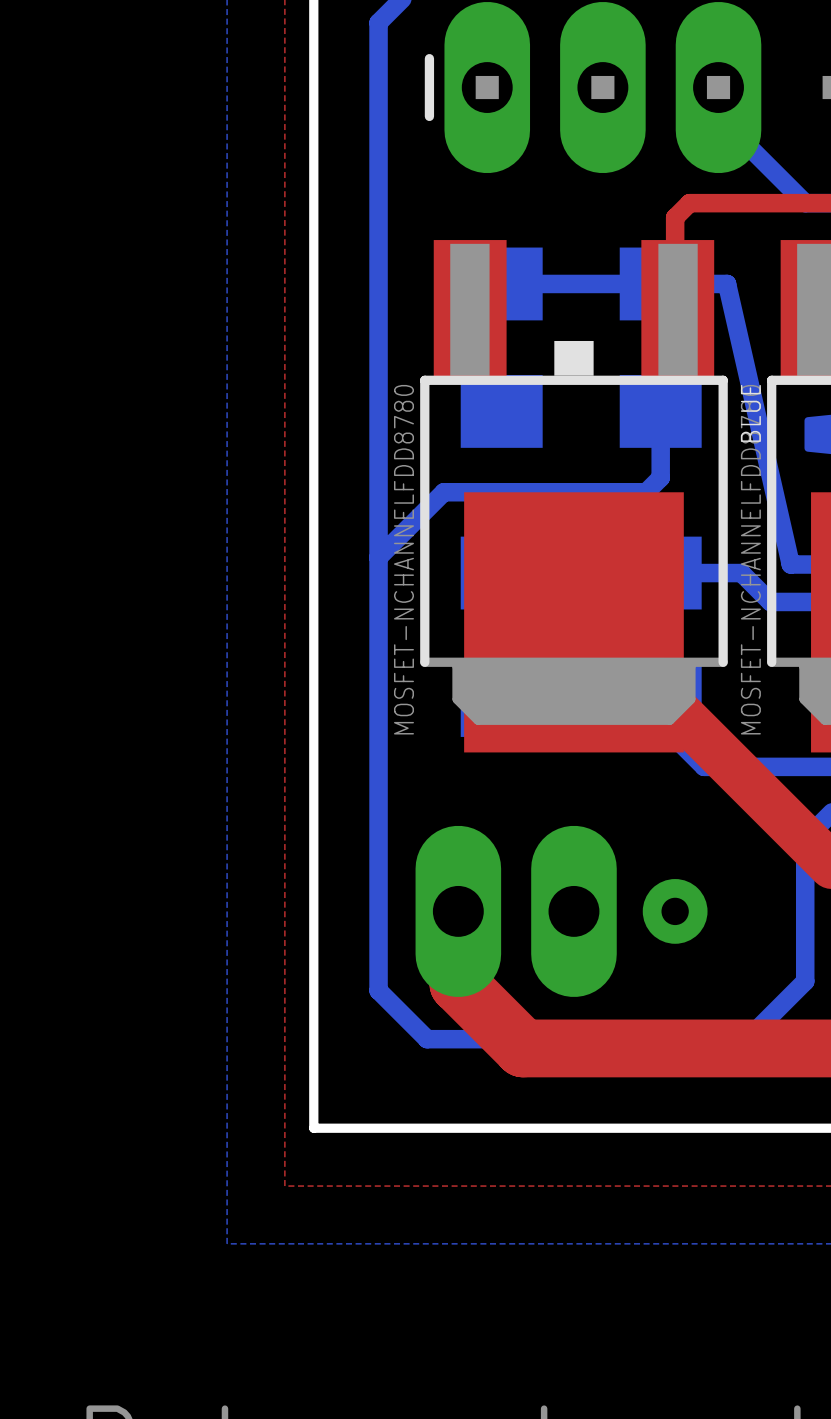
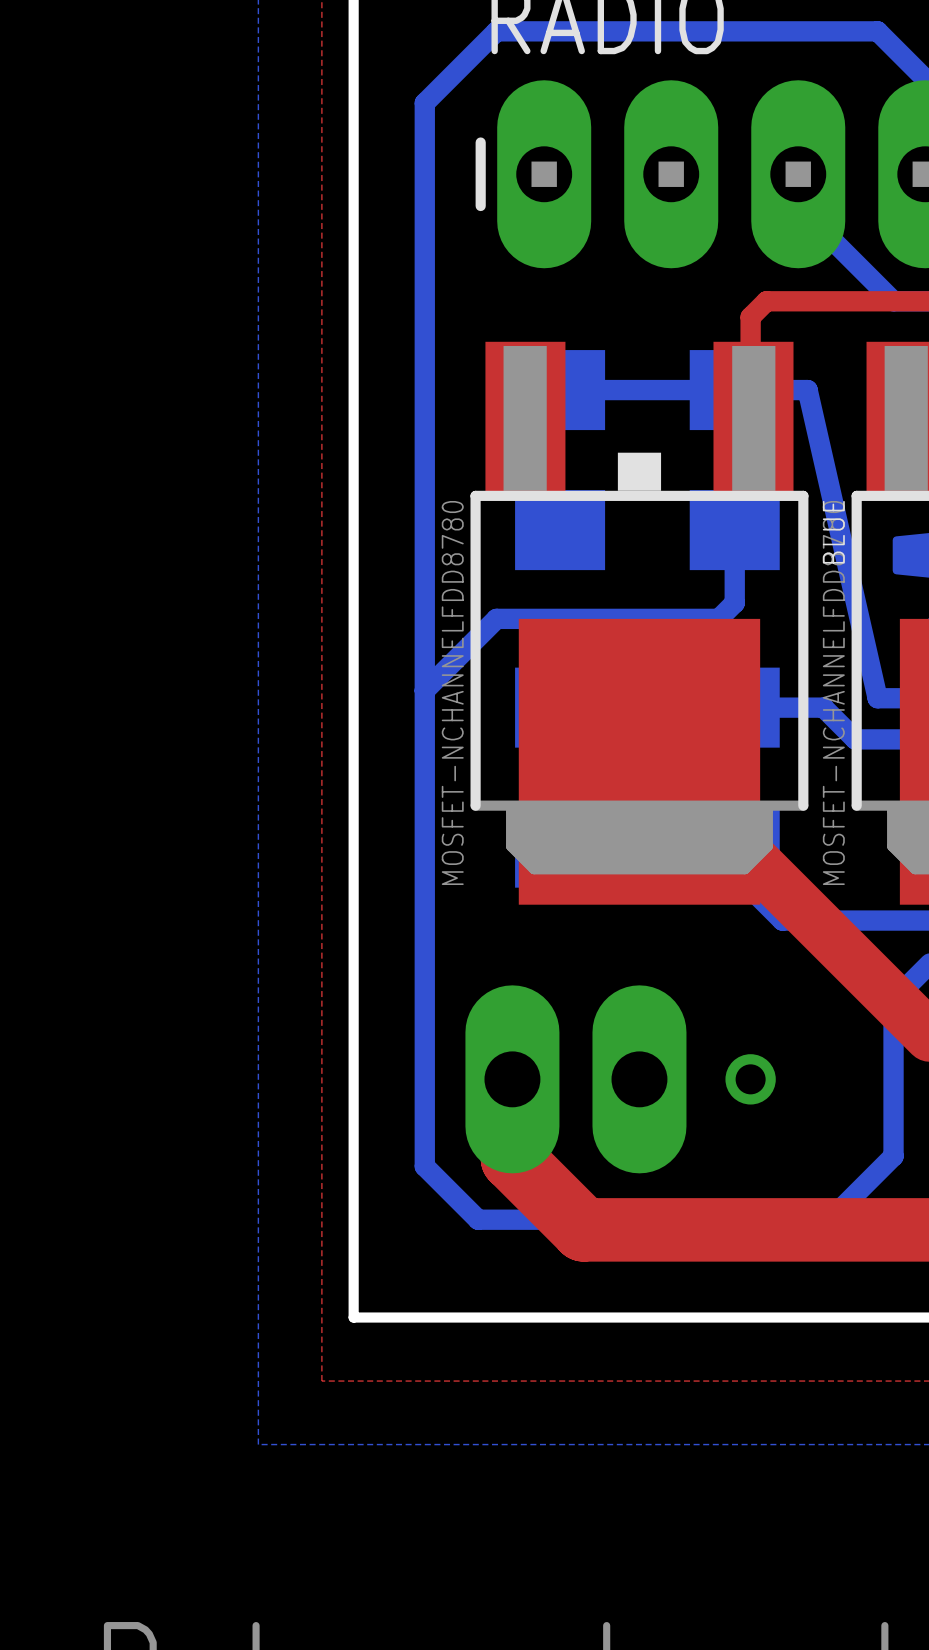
via size: [642, 879, 708, 944] -> [725, 1054, 776, 1105]

